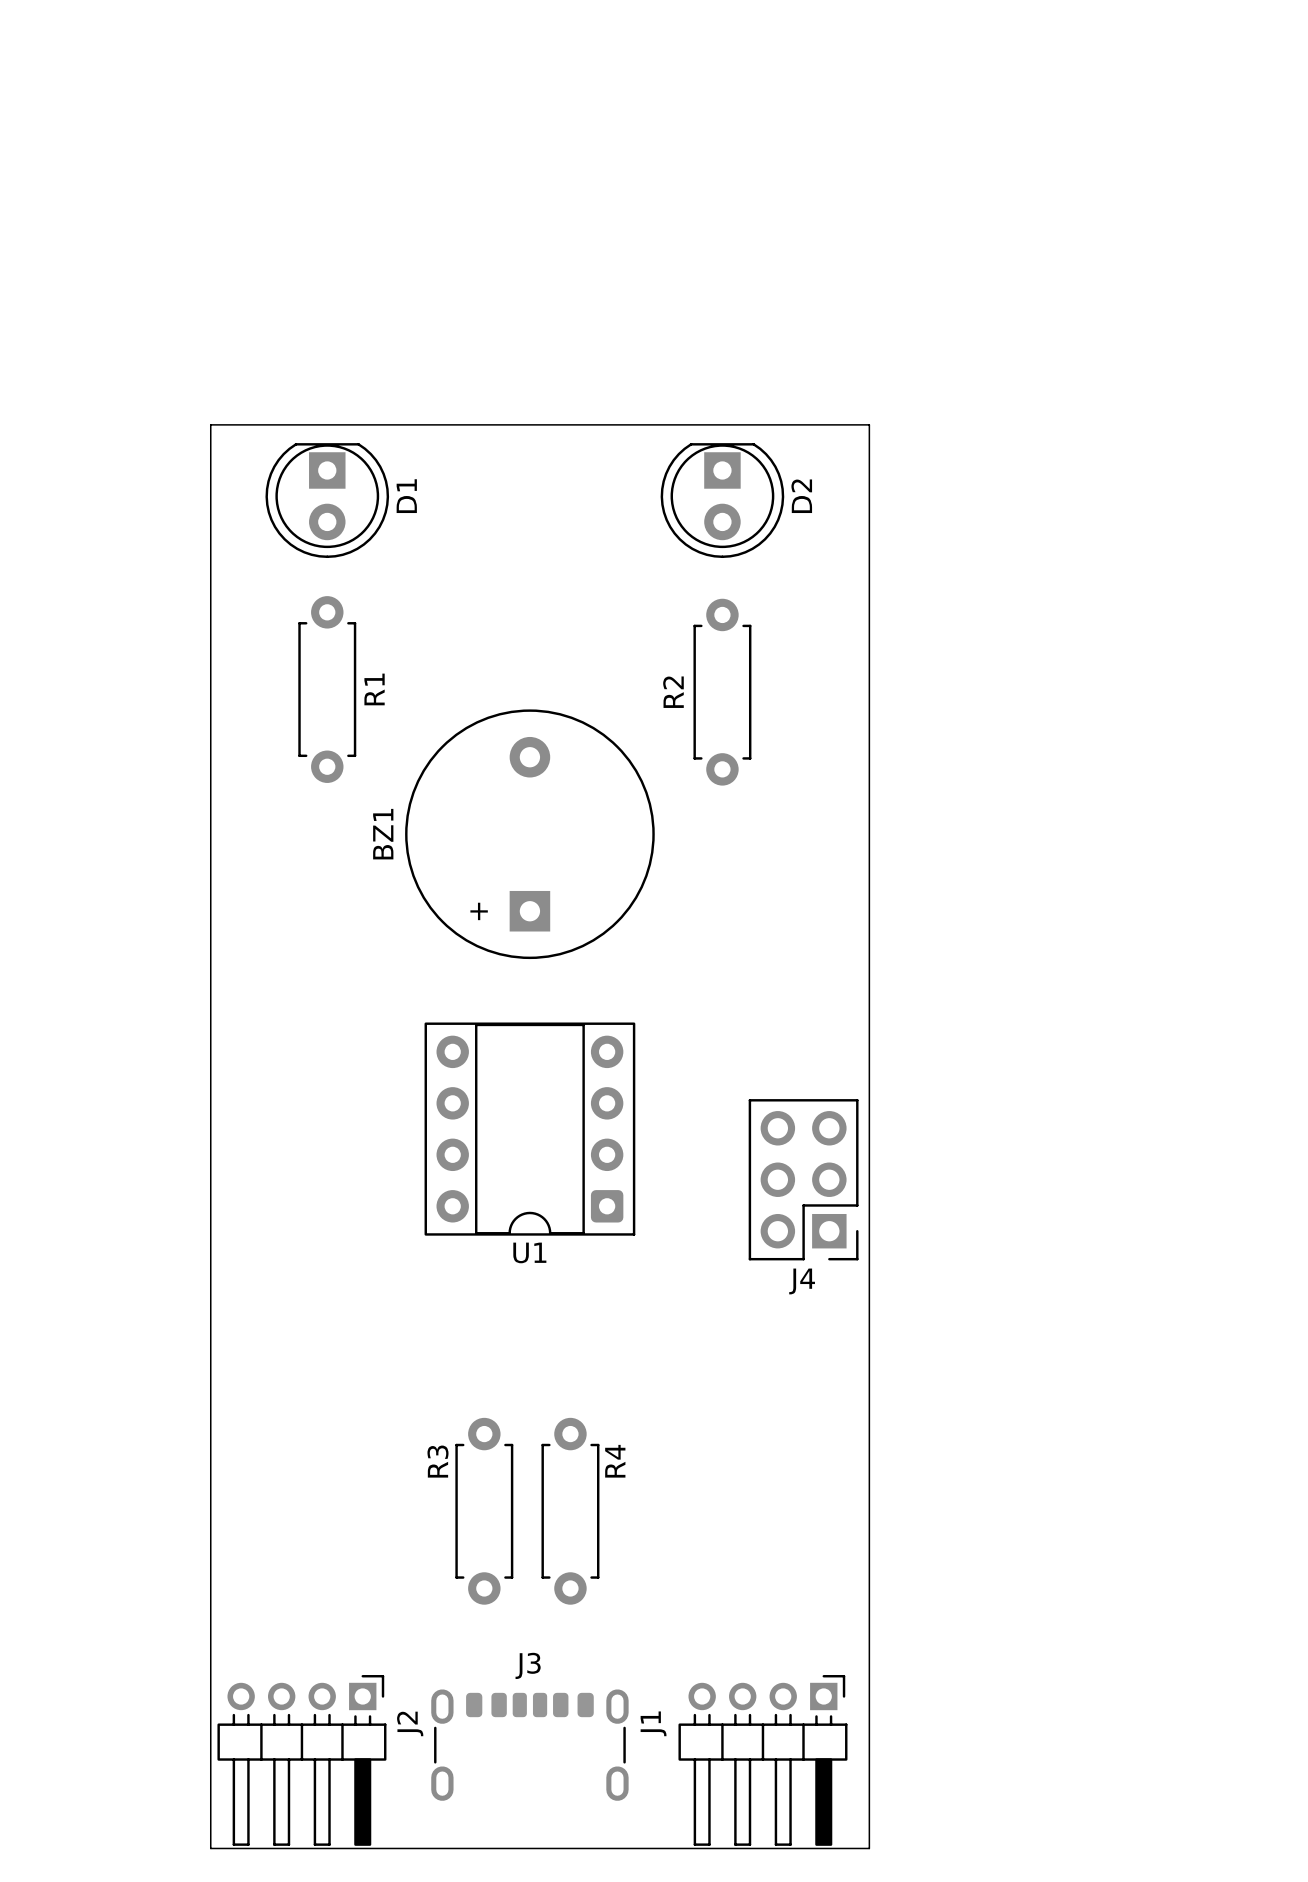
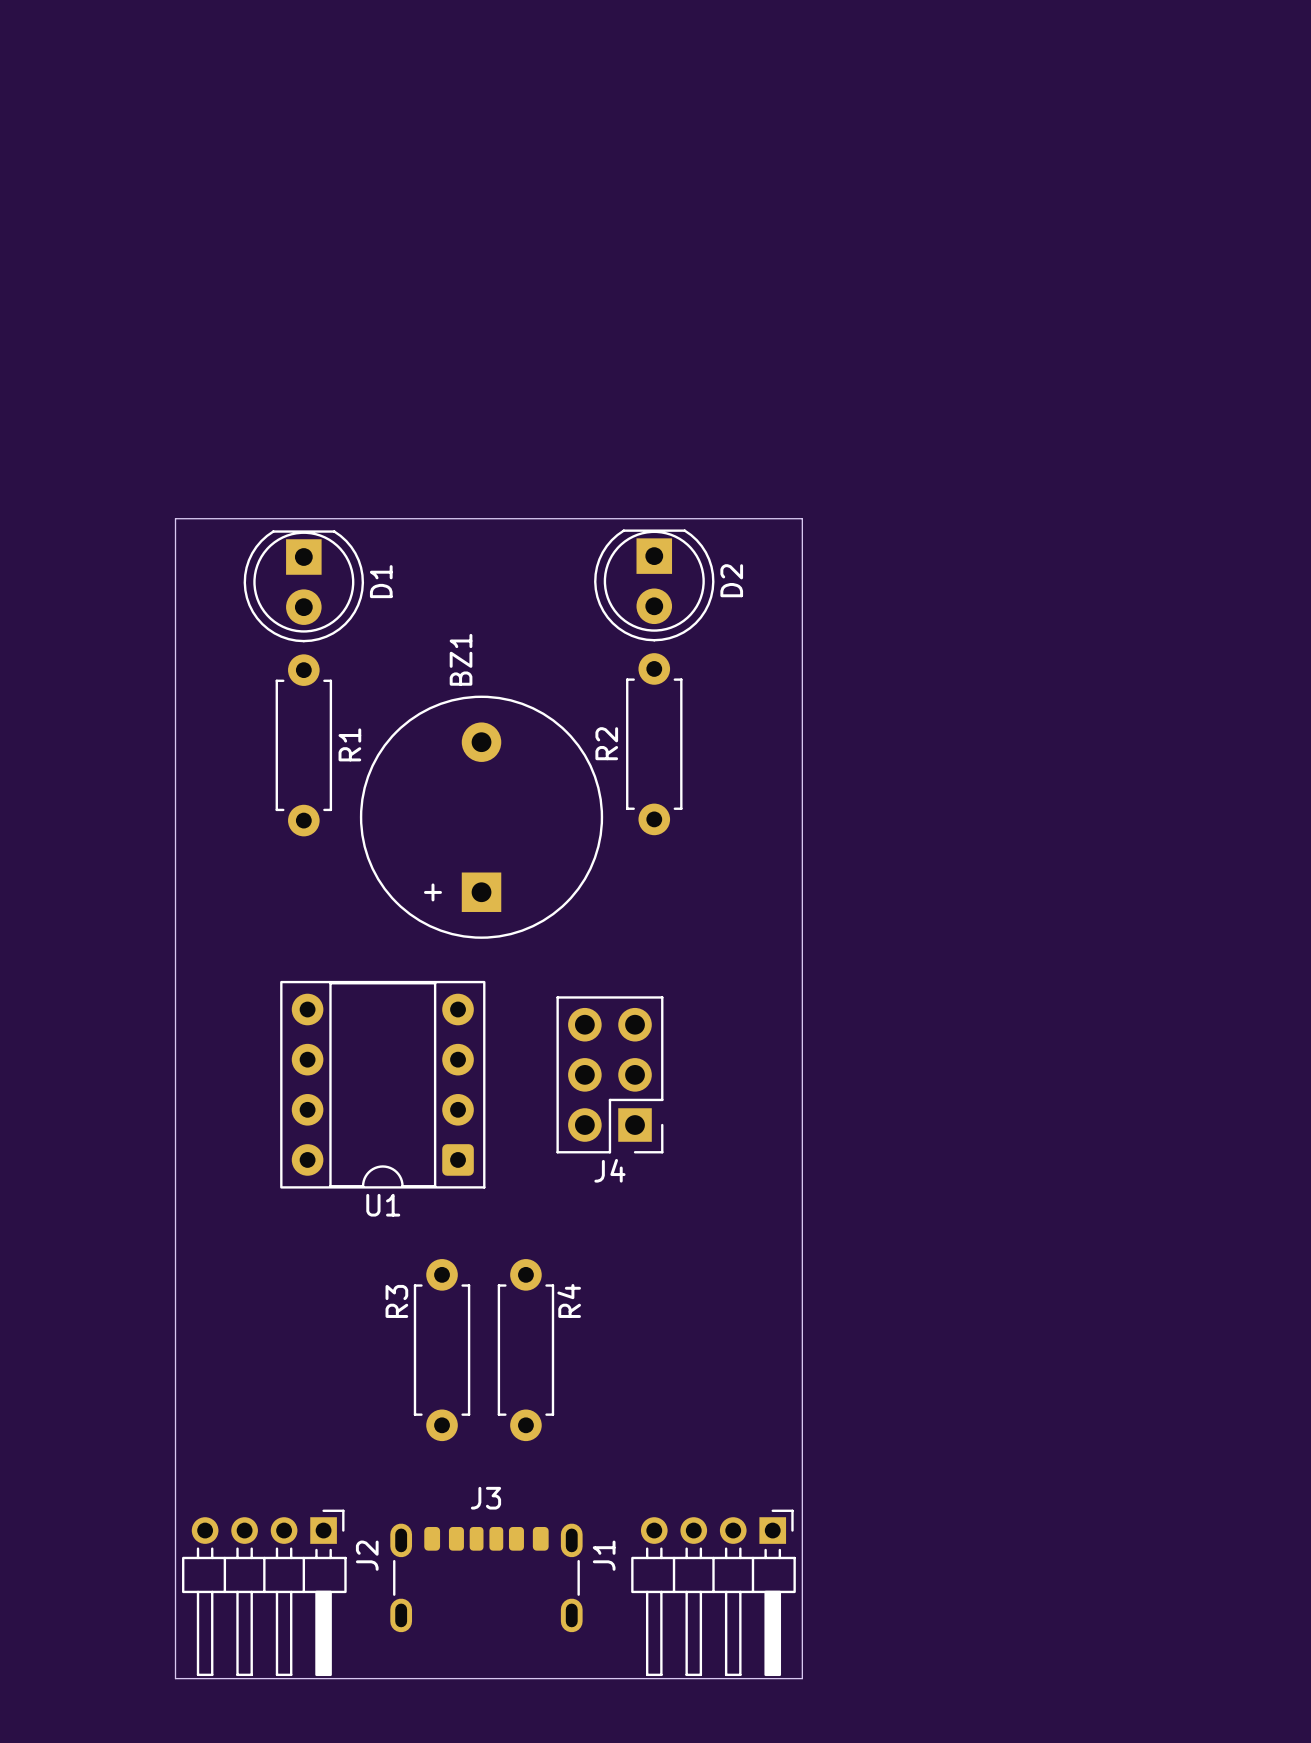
D1 position: (327, 500) -> (303, 586)
D2 position: (722, 500) -> (654, 585)
board edge: (210, 657) (210, 424) (869, 424) (869, 1848) (854, 1848) -> (175, 518) (802, 518) (802, 1678)
R1 position: (327, 689) -> (303, 745)
R2 position: (722, 692) -> (654, 744)
BZ1 name position: BZ1 (383, 834) -> BZ1 (461, 659)
BZ1 position: (529, 834) -> (481, 817)
U1 position: (529, 1129) -> (382, 1084)
J4 position: (803, 1179) -> (609, 1074)

